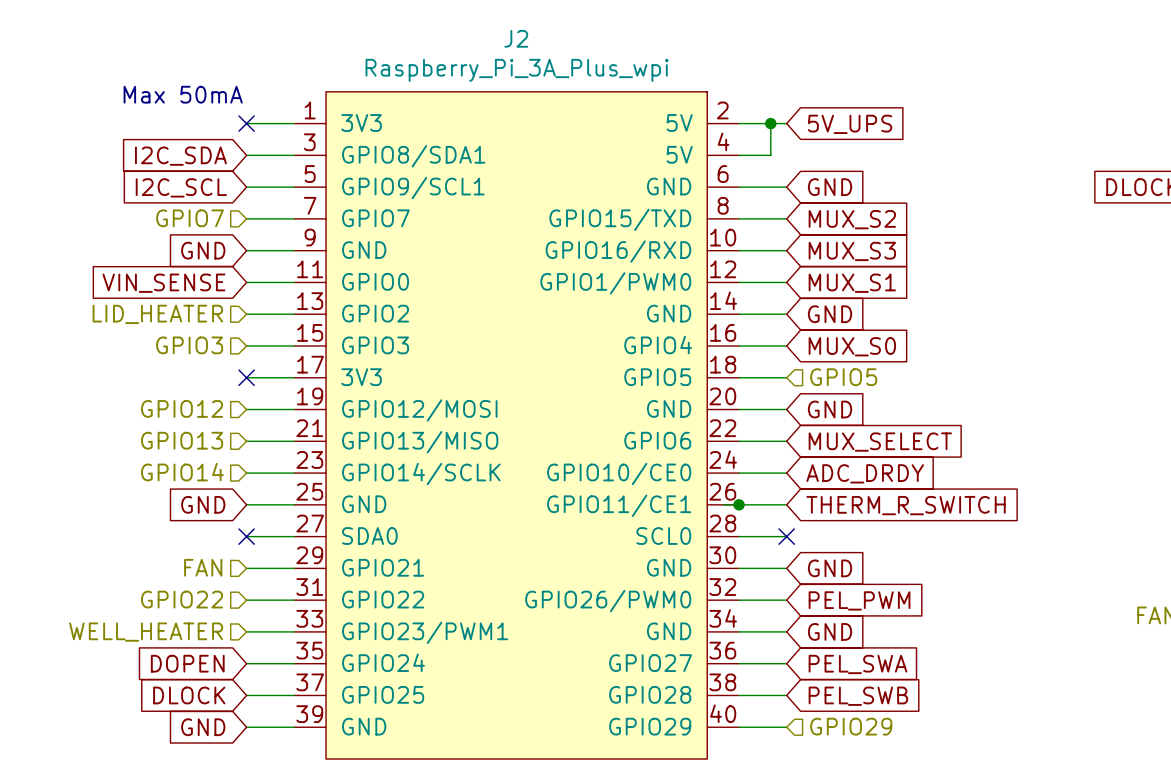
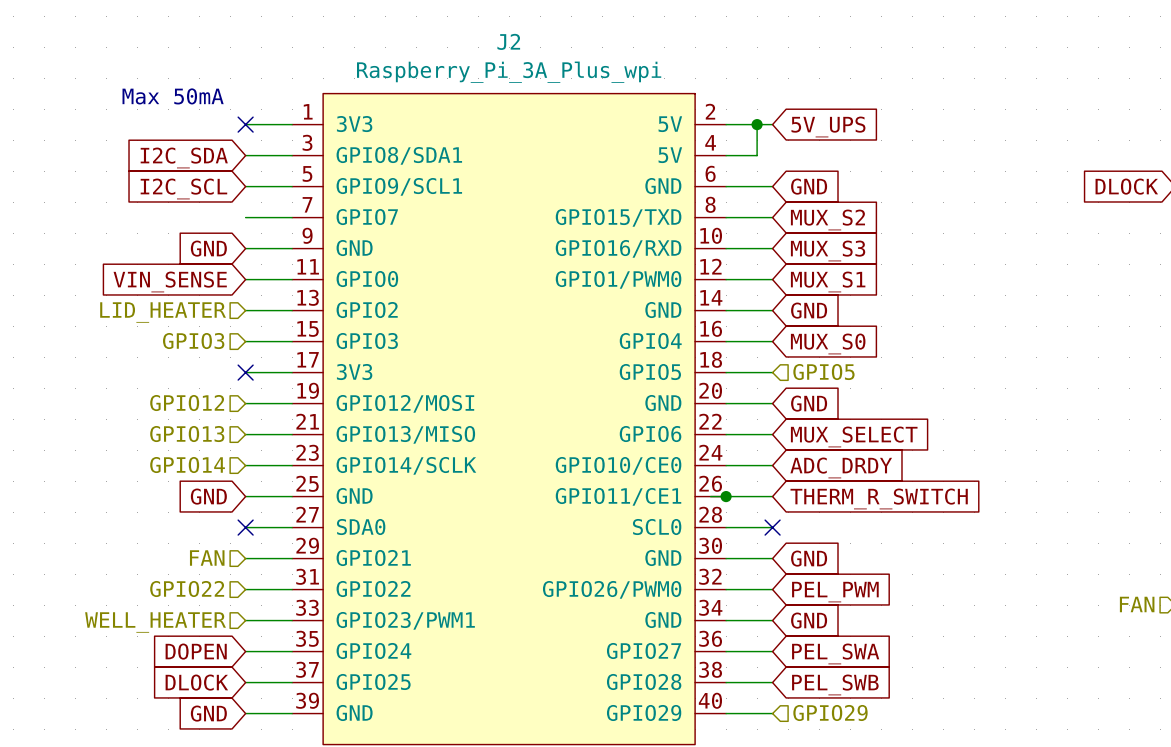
hierarchical label: GPIO7 (189, 218) -> none

